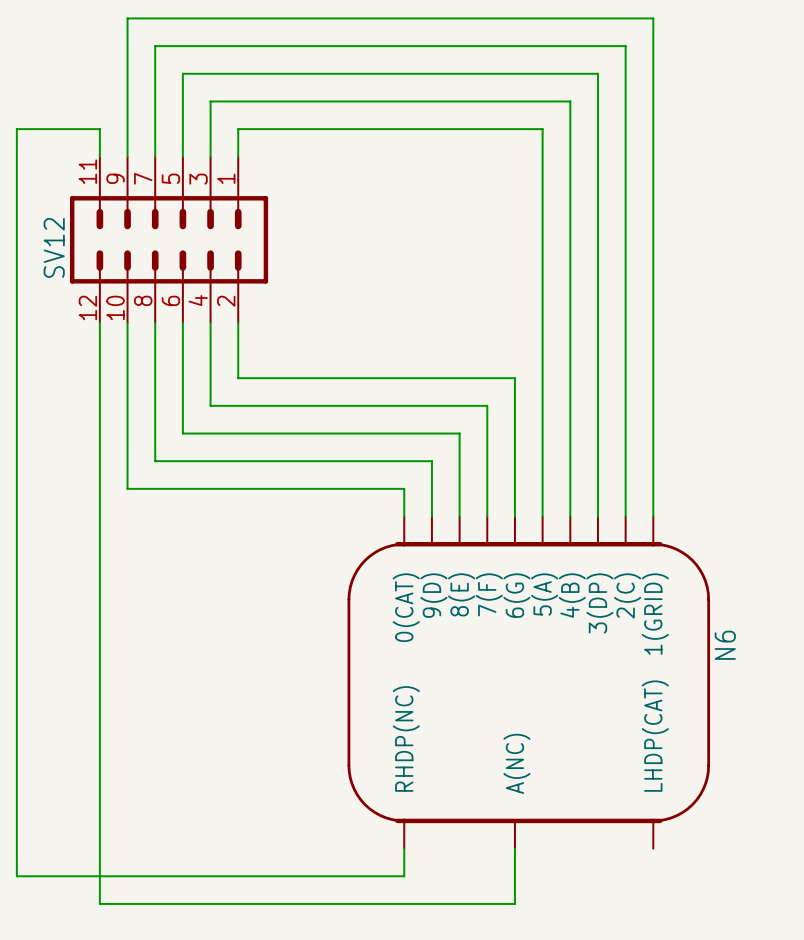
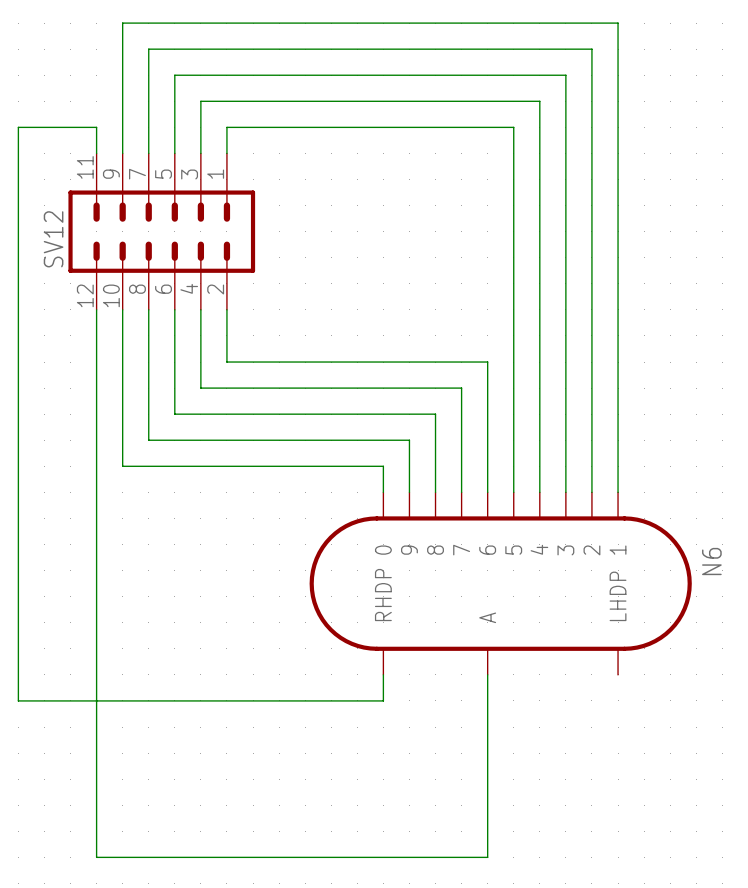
N6 symbol: [347, 516, 711, 849] -> [309, 492, 692, 675]
N6 name position: N6 (725, 645) -> N6 (711, 561)
wire: none -> (487, 674) (487, 805)
wire: (16, 737) (16, 876) (404, 876) (404, 848) -> (18, 700) (383, 700) (383, 674)

